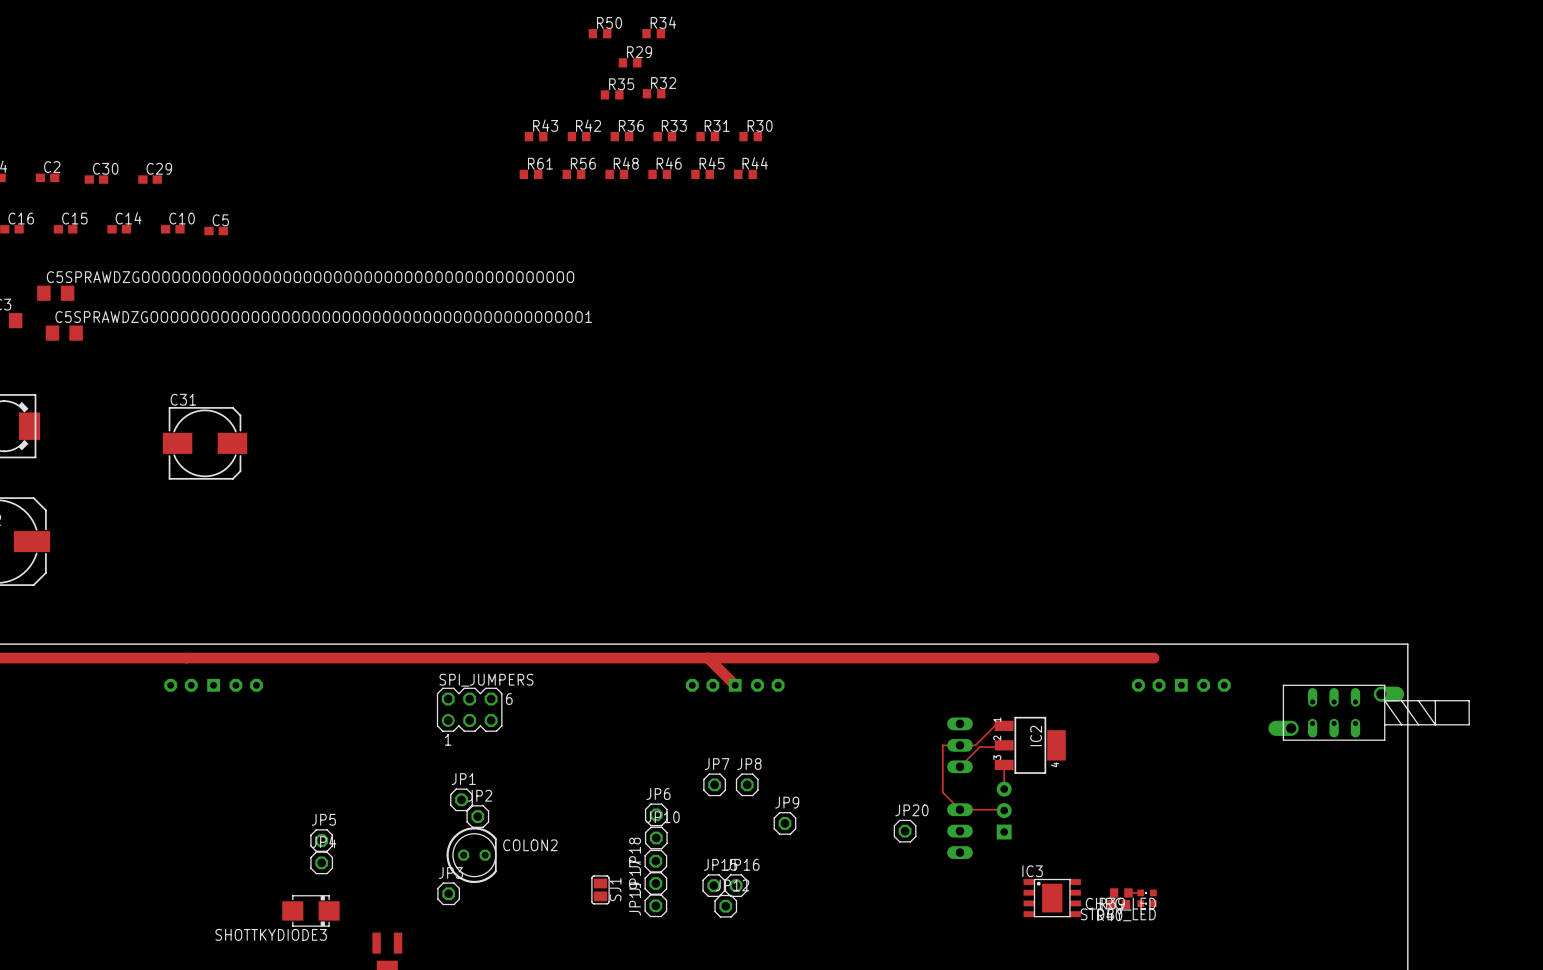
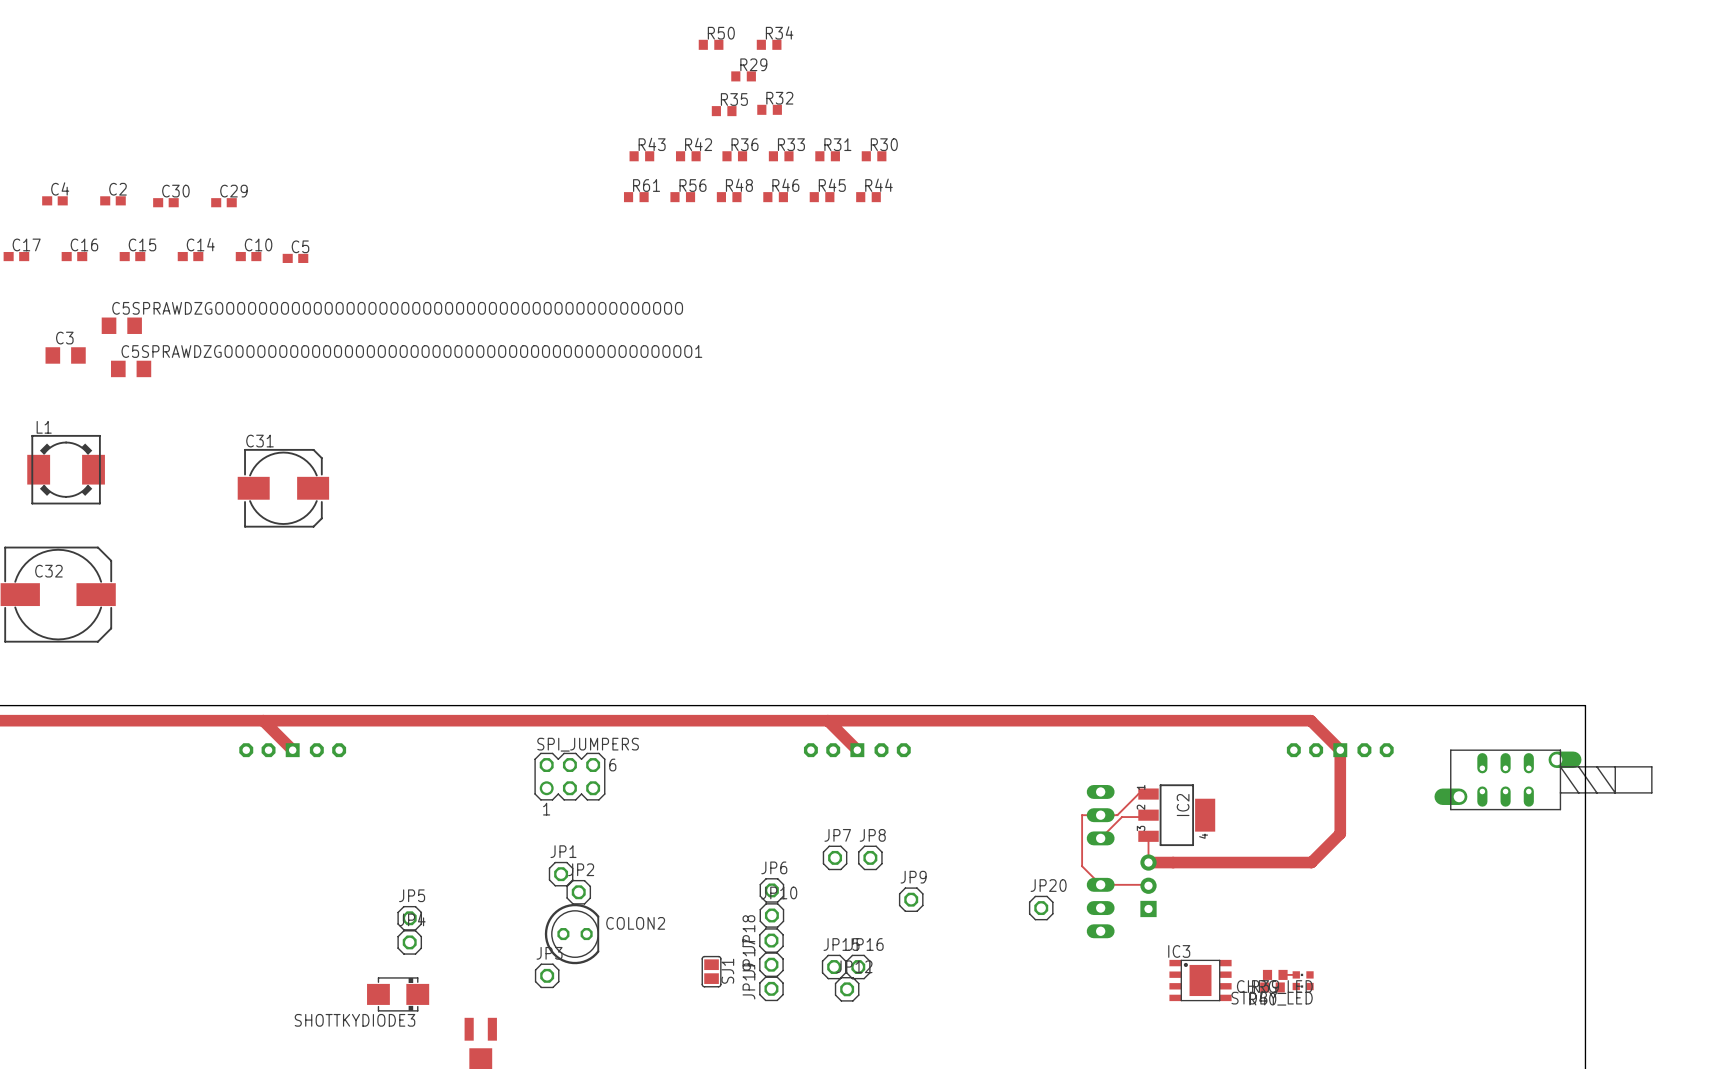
track: none -> (263, 720) (292, 750)
track: none -> (1310, 720) (1340, 750) (1340, 833) (1311, 862) (1148, 862)

